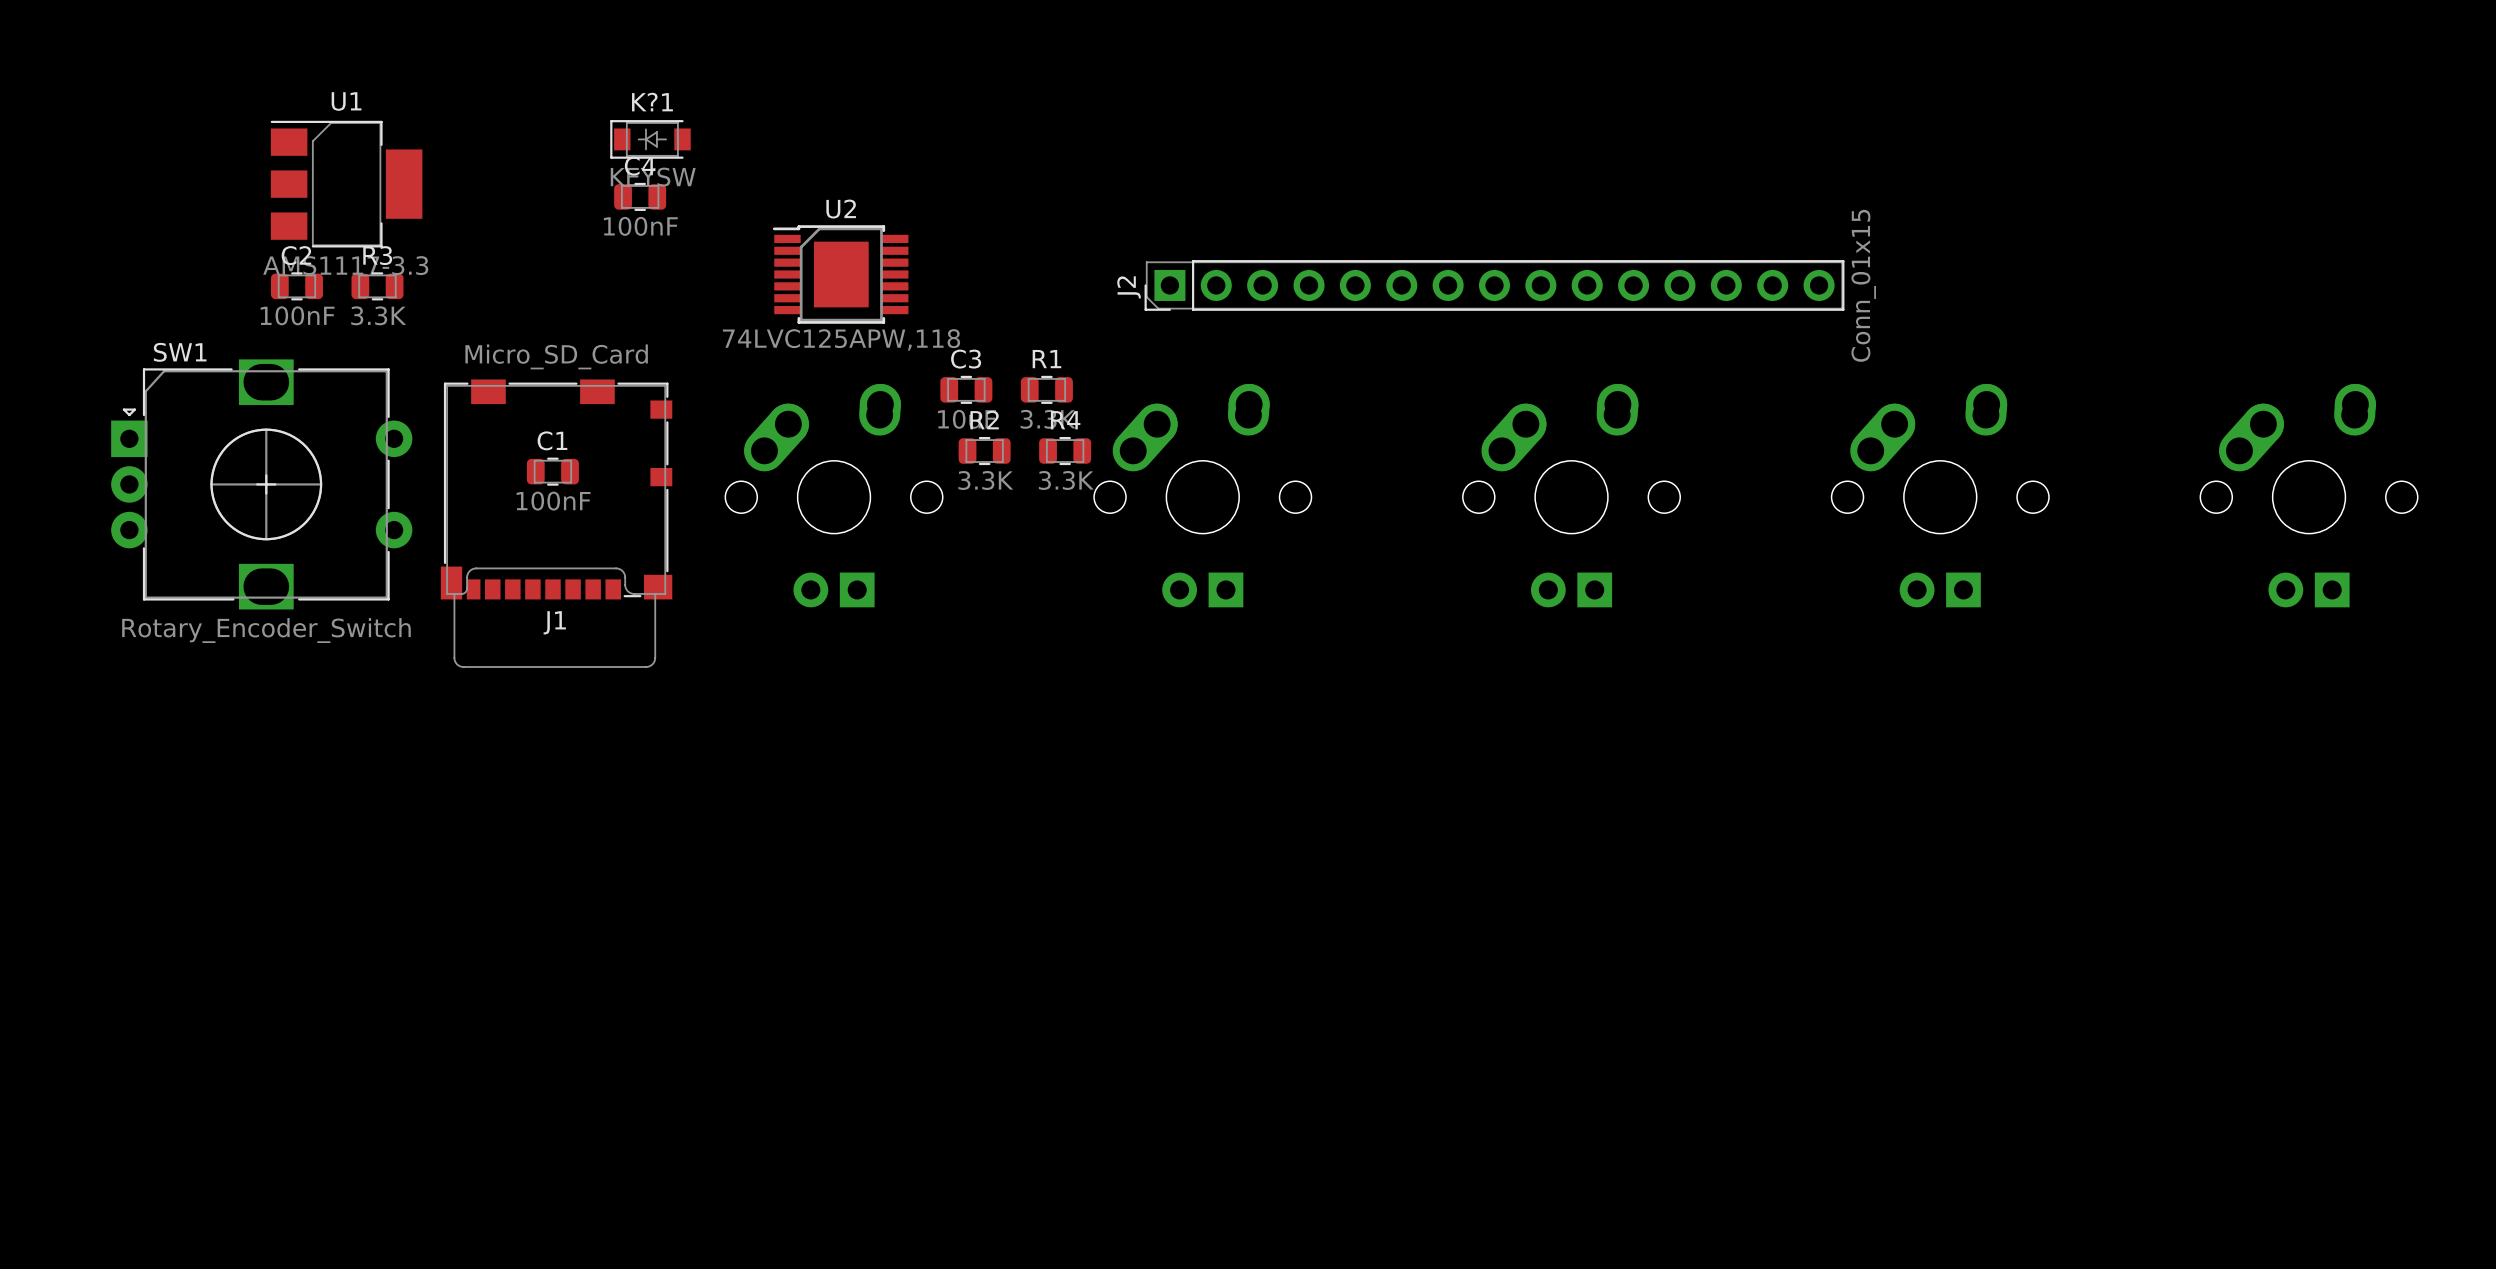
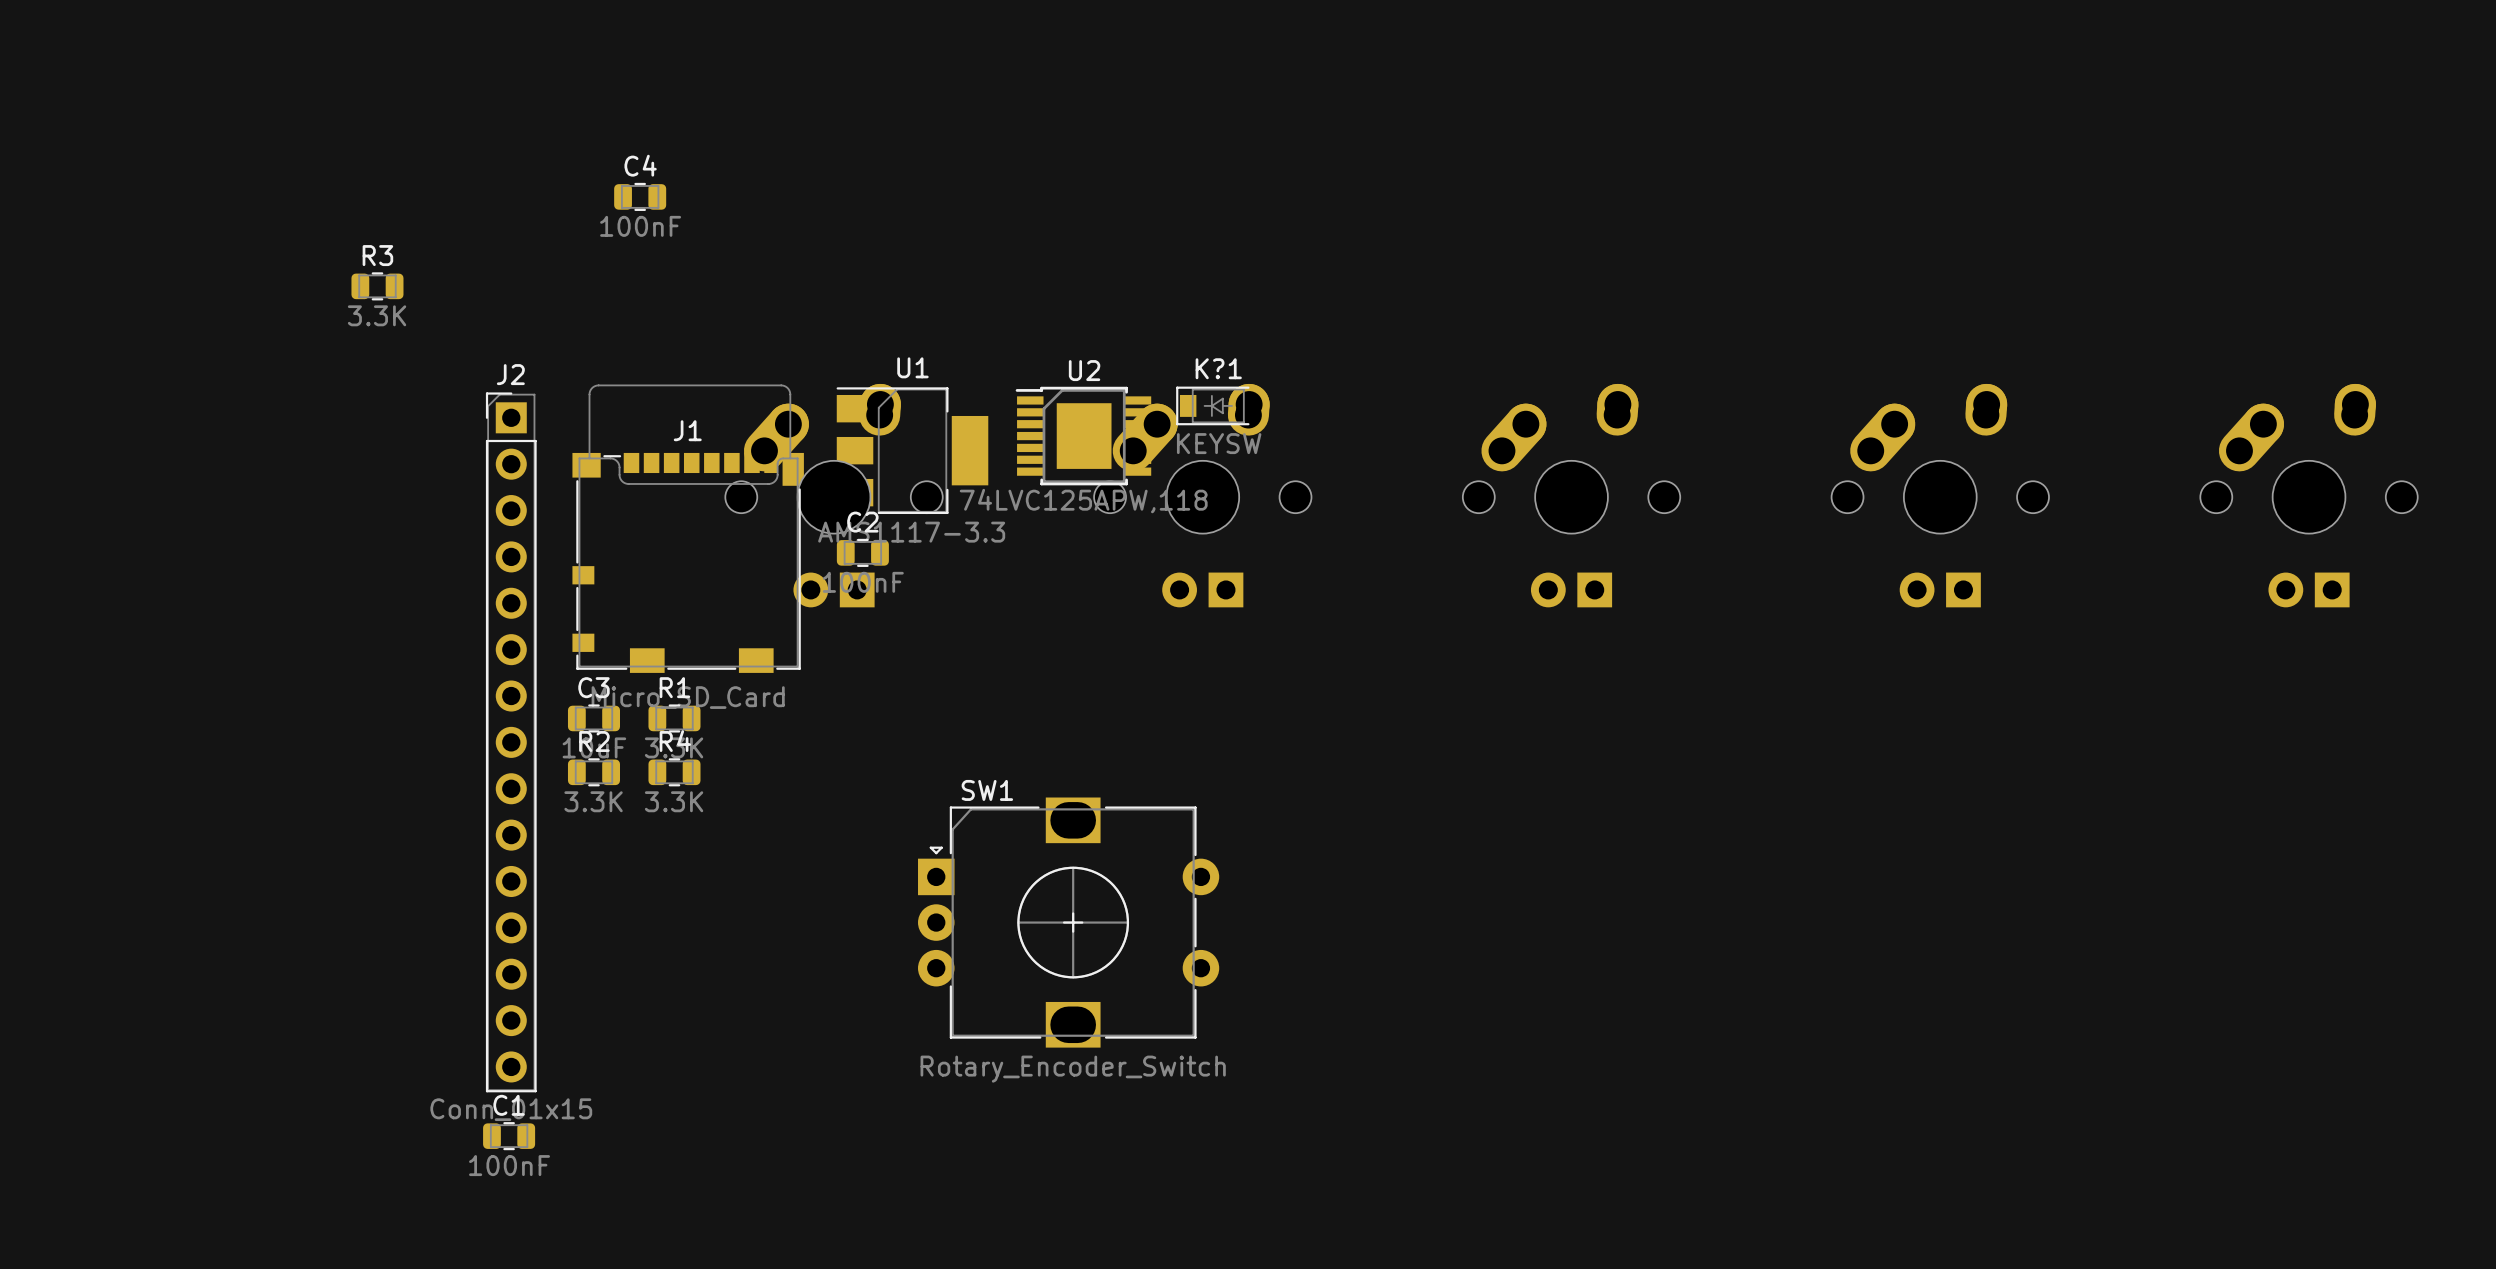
K?1 position: (650, 139) -> (1216, 405)
U1 position: (346, 184) -> (912, 450)
U2 position: (840, 274) -> (1083, 436)
J2 rotation: 0° (1494, 285) -> 90° clockwise (511, 742)
J2 position: (1494, 285) -> (511, 742)
C2 position: (296, 286) -> (862, 552)
C3 position: (966, 389) -> (593, 718)
R1 position: (1046, 389) -> (674, 718)
R2 position: (984, 451) -> (593, 772)
R4 position: (1065, 451) -> (674, 772)
C1 position: (552, 471) -> (509, 1136)
SW1 position: (261, 484) -> (1068, 922)
J1 rotation: 0° (556, 523) -> 180° (688, 528)

